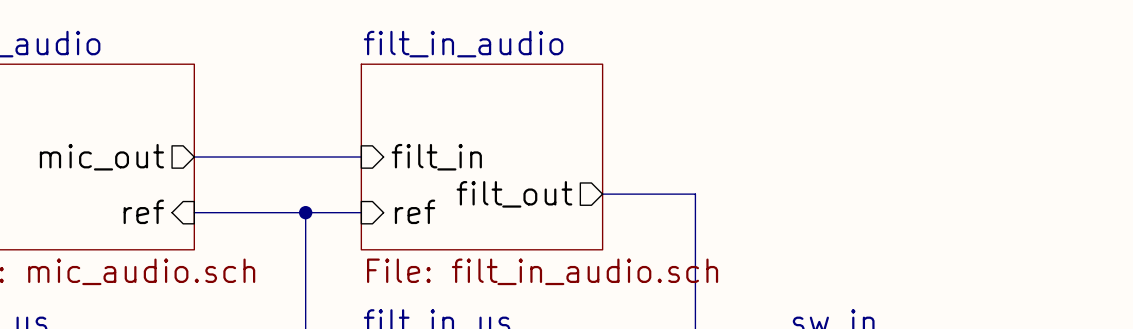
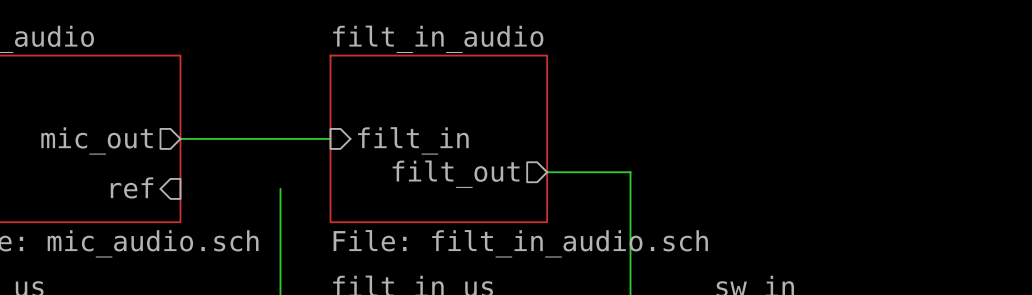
sheet pin: ref (415, 211) -> none
wire: (194, 212) (361, 212) -> none
junction: (305, 212) -> none

